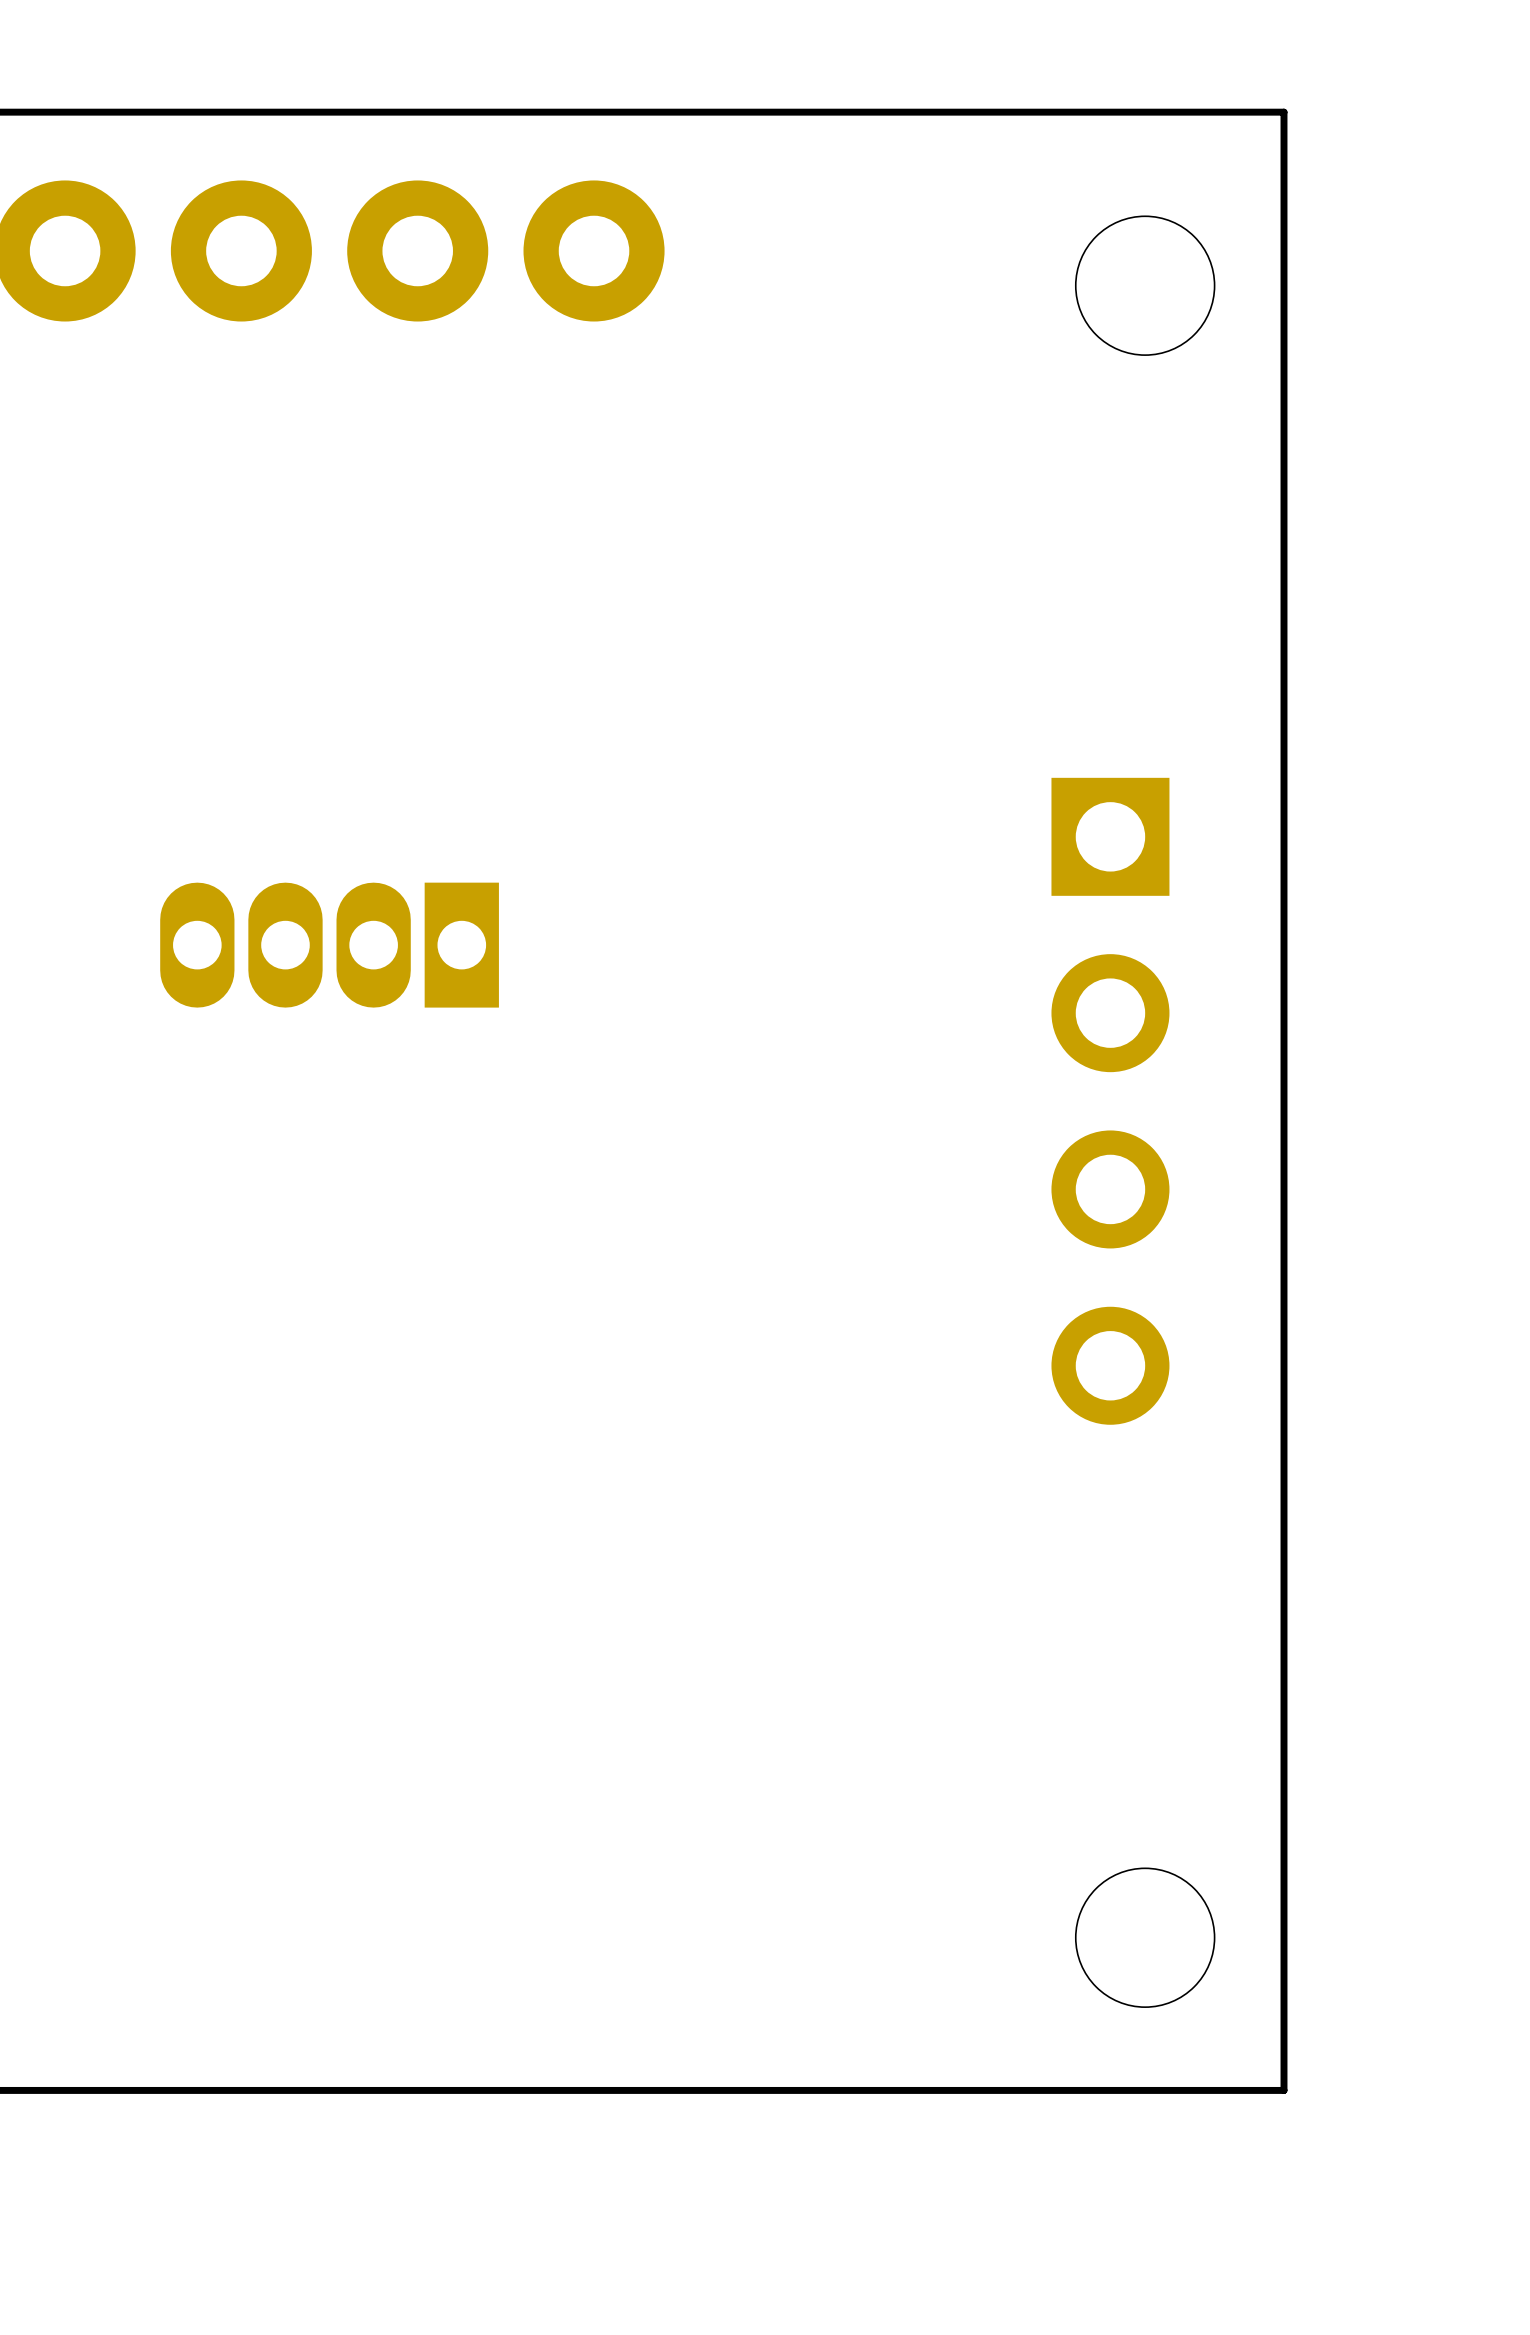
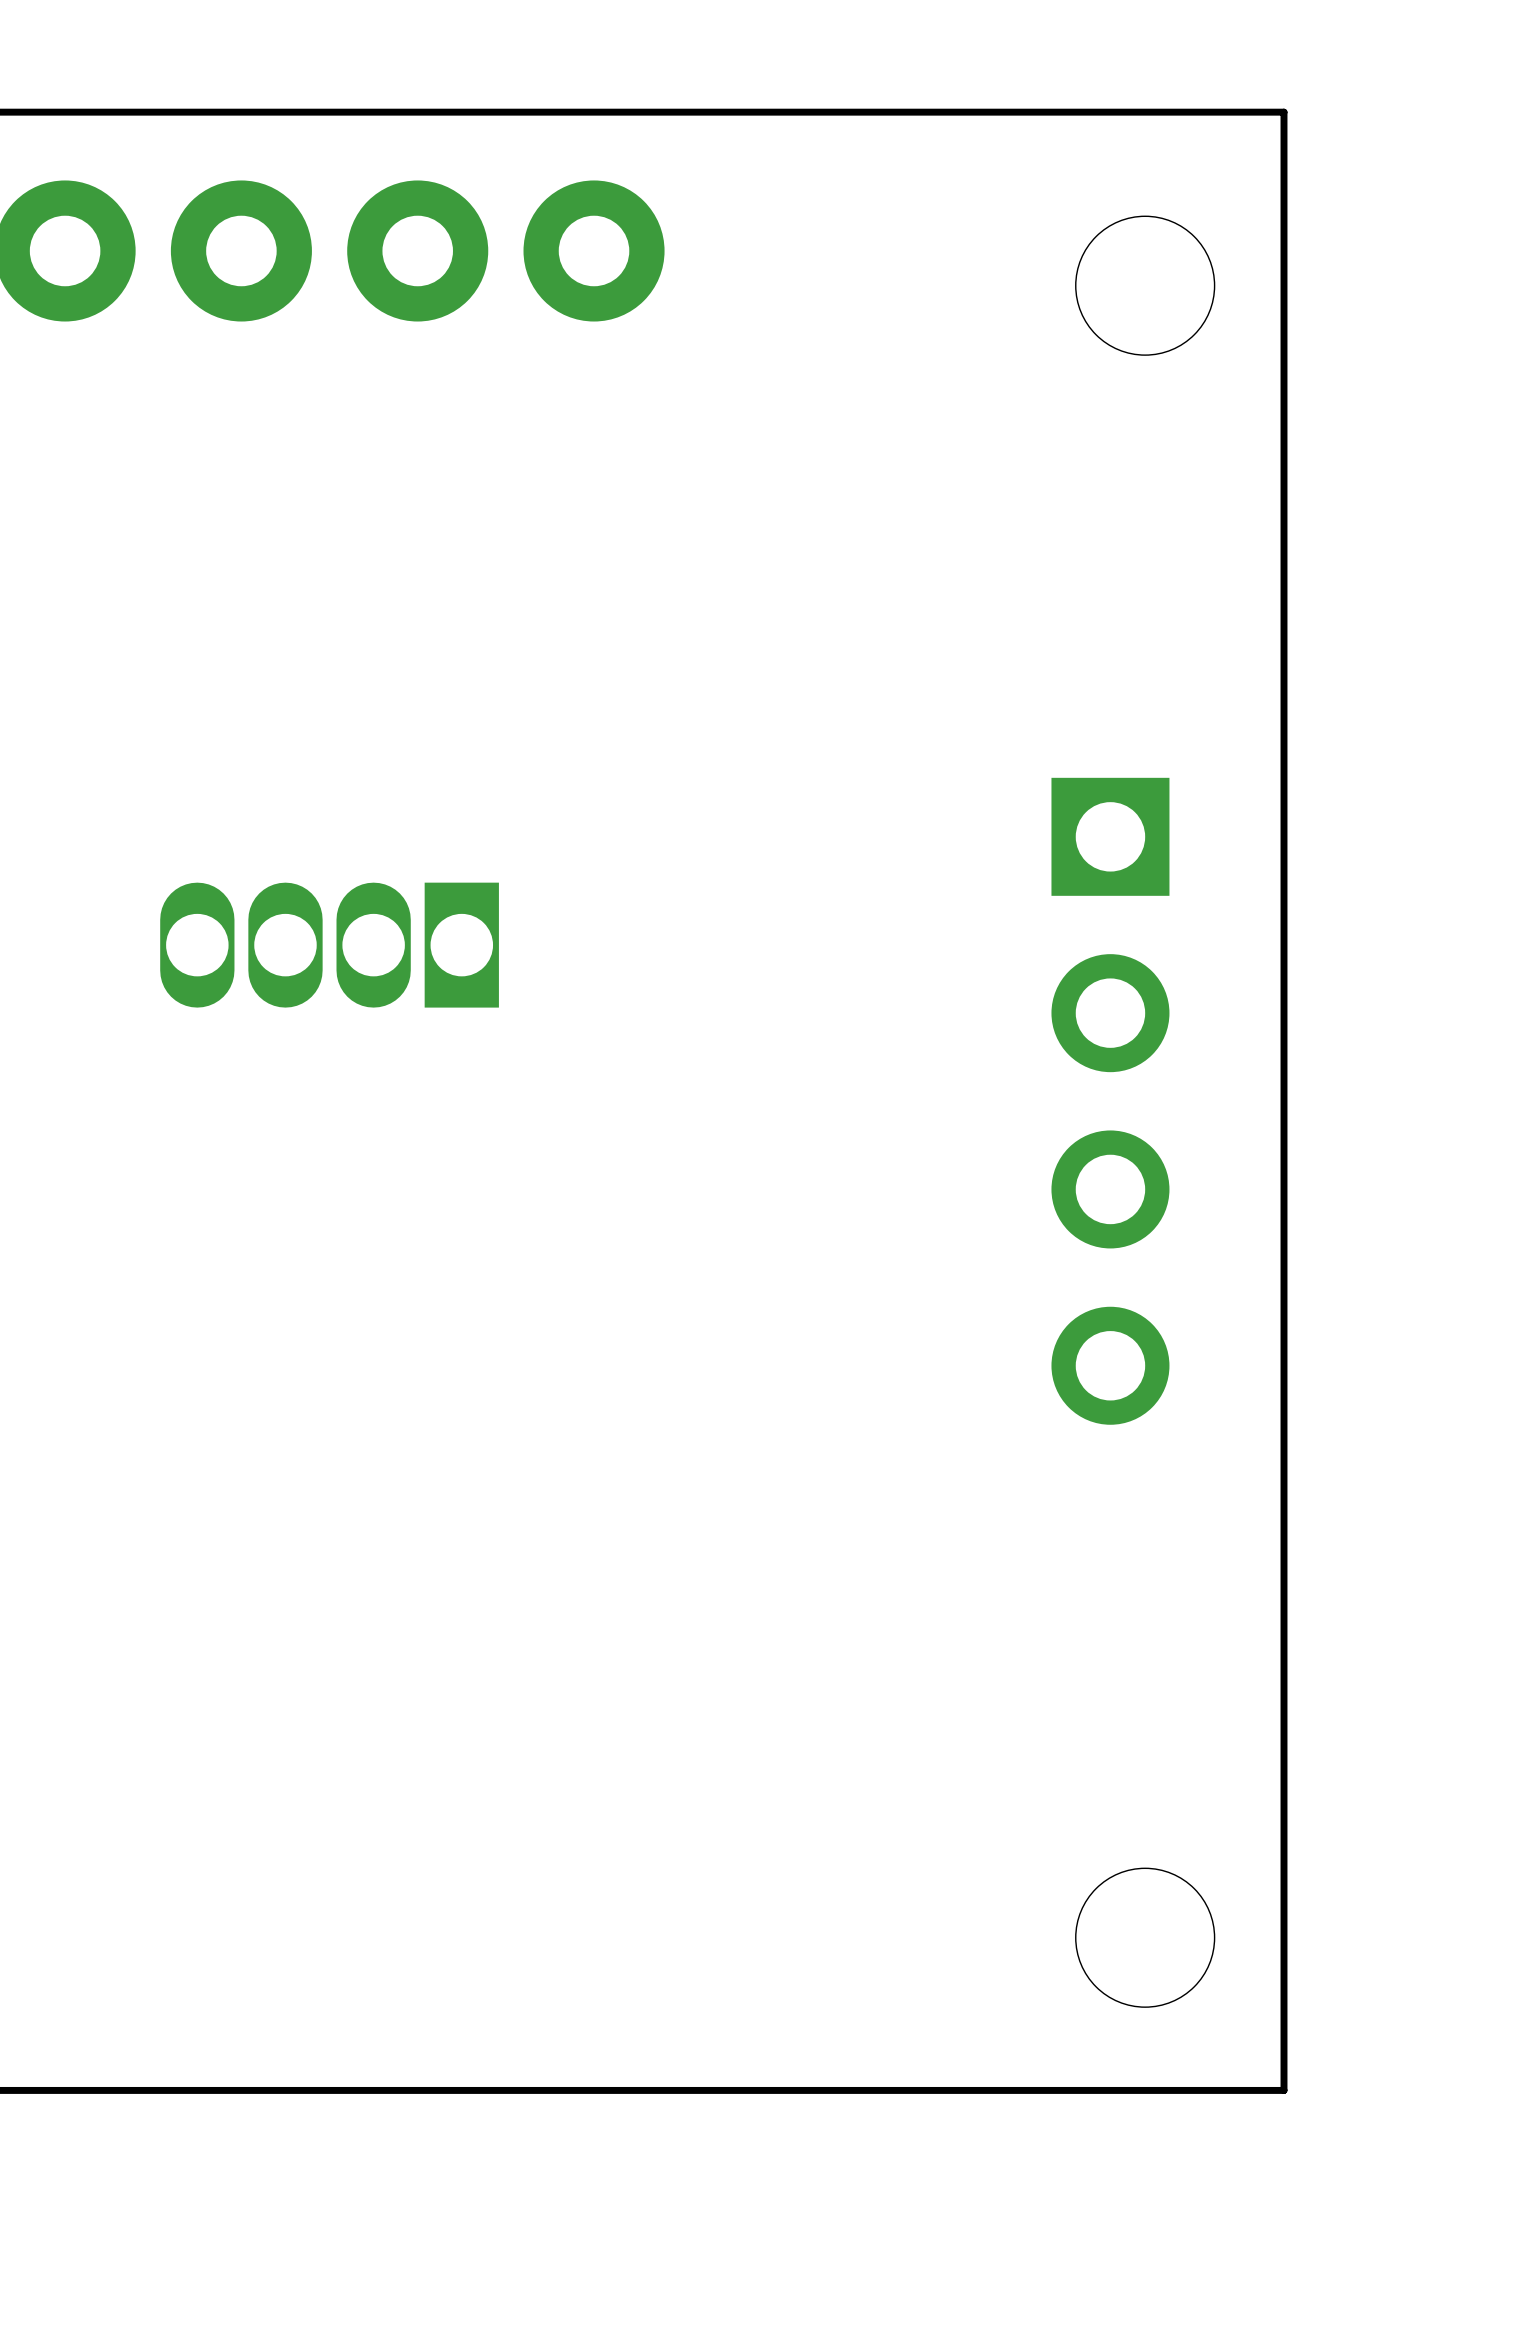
part footprint: [160, 882, 499, 1008] -> [160, 882, 499, 1008]

